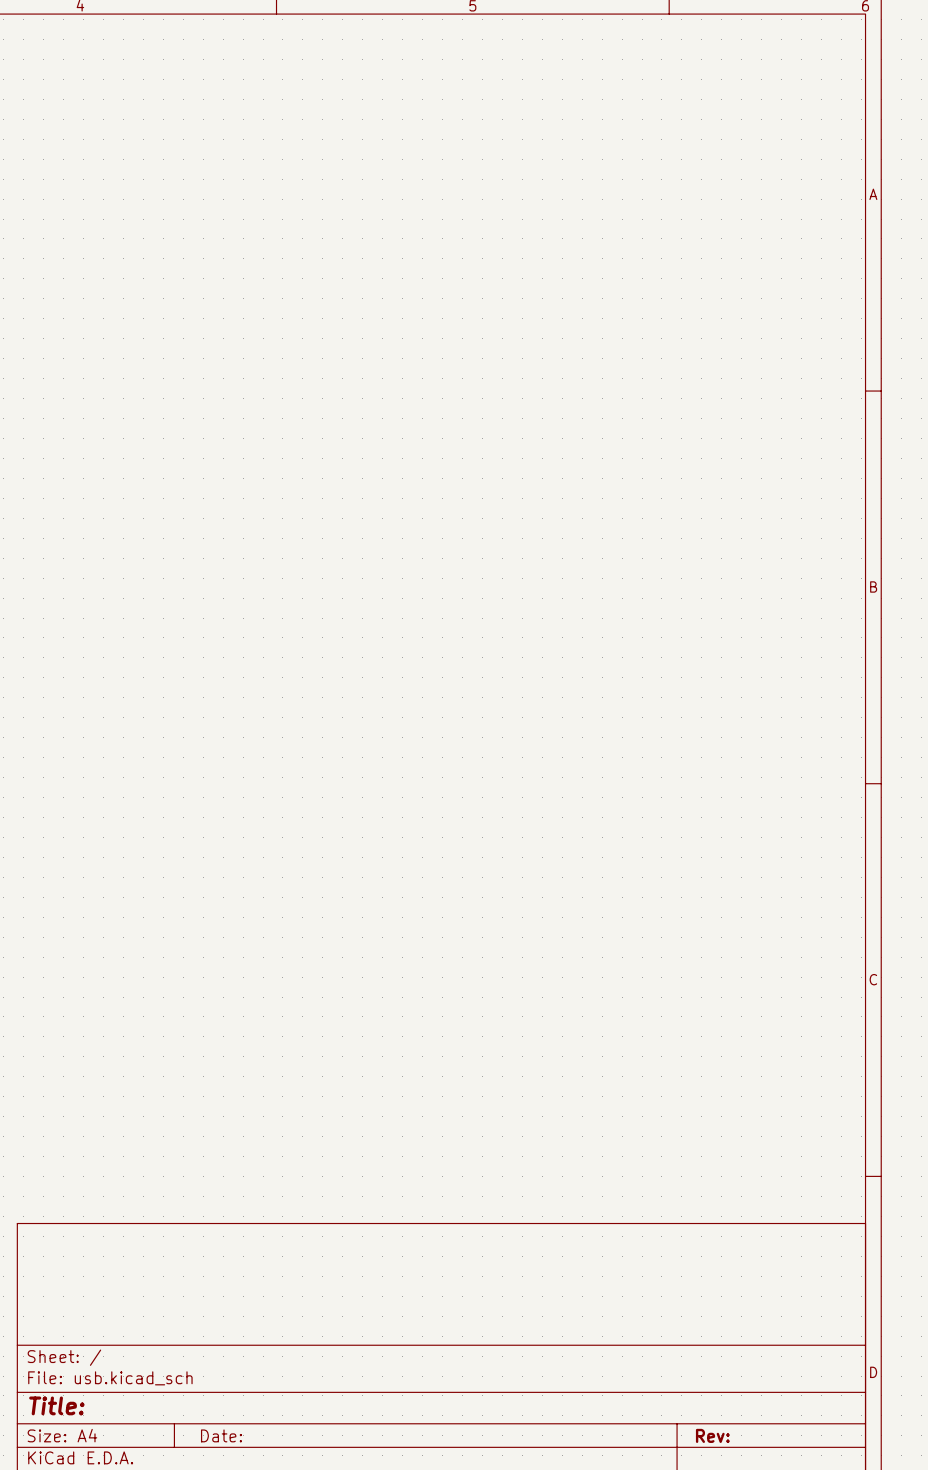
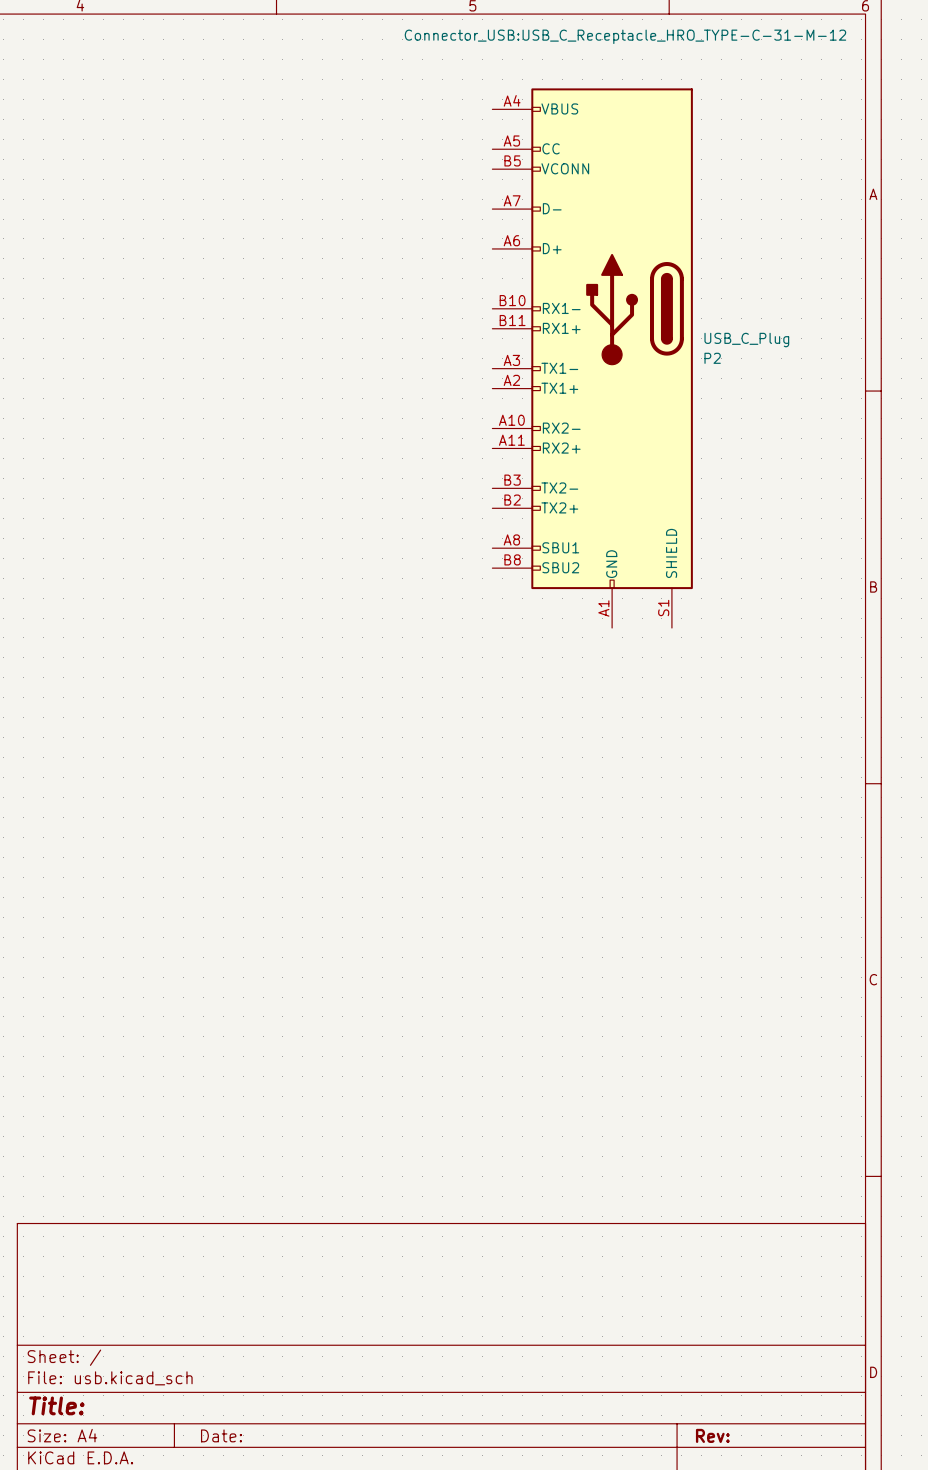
P2: none -> USB_C_Plug (592, 358)

